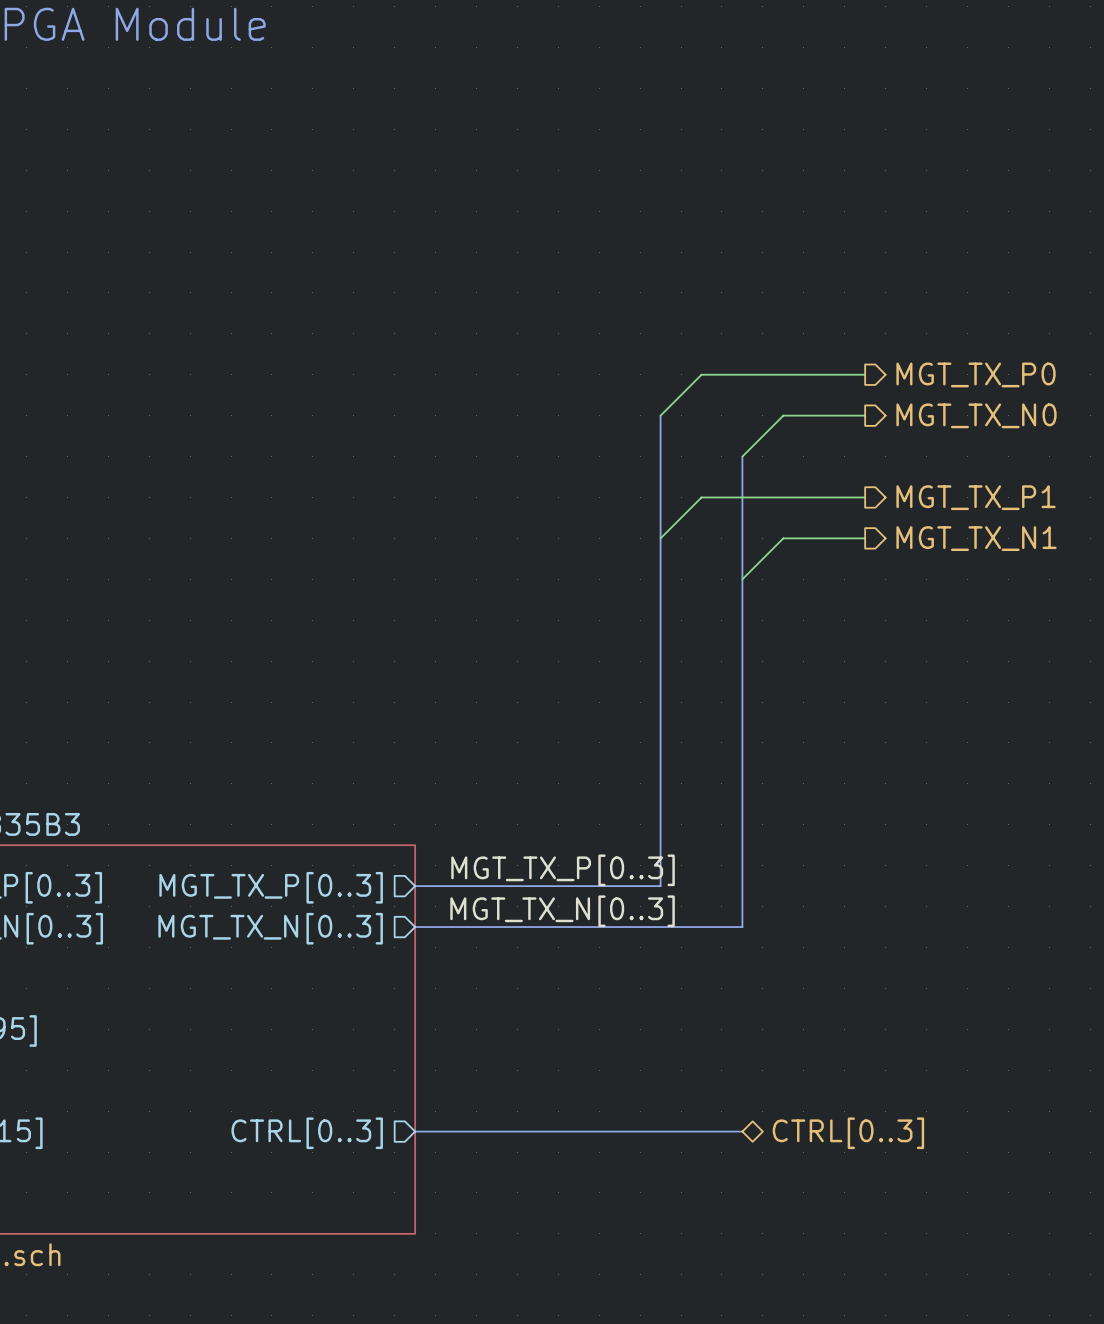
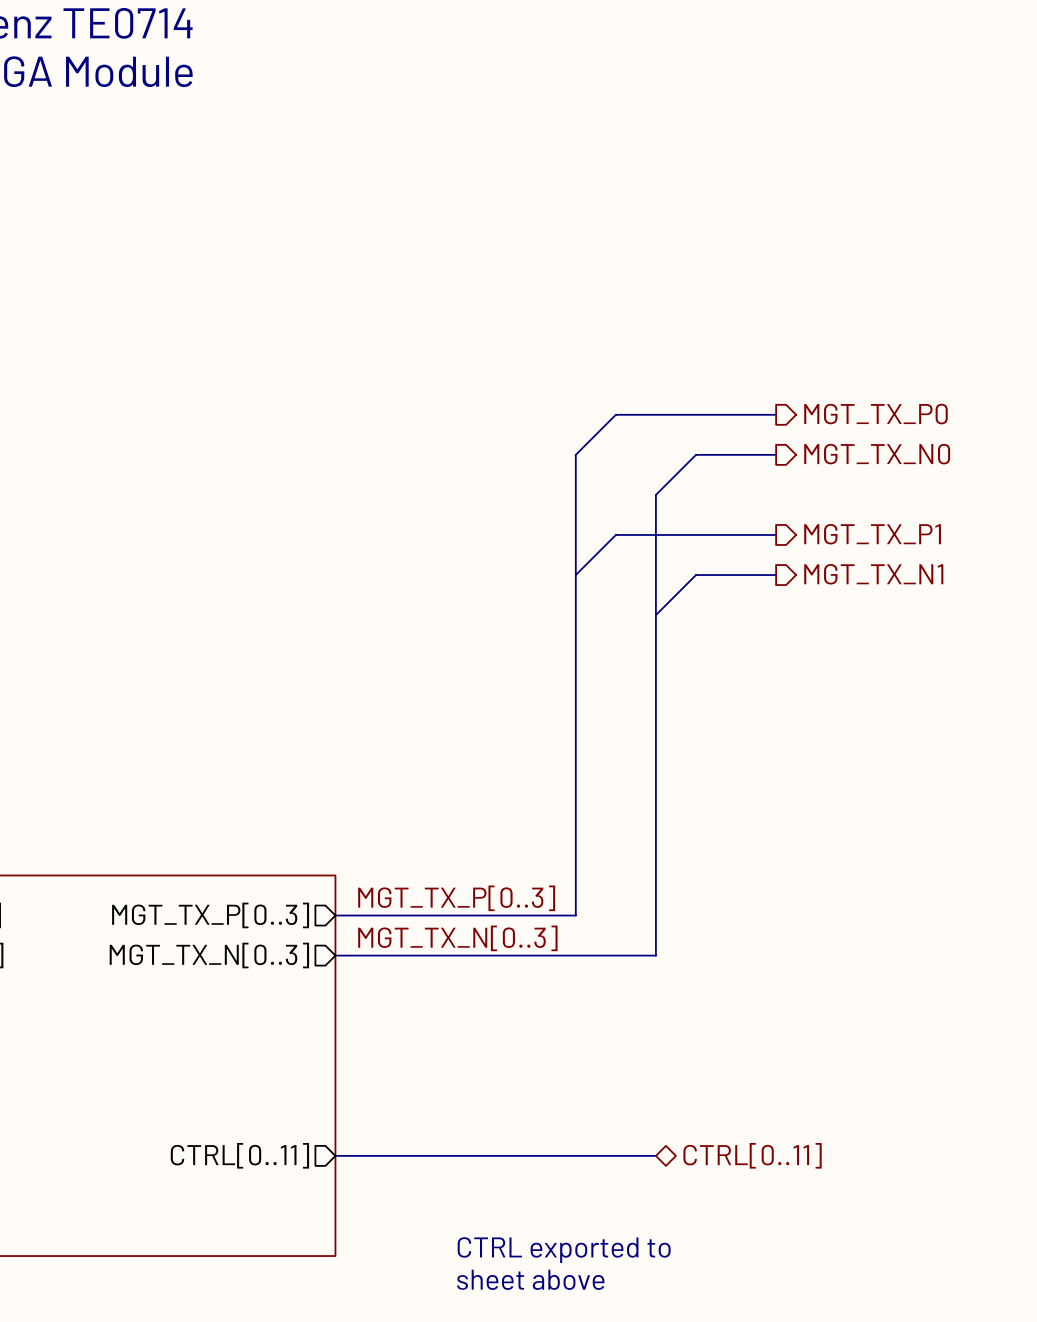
label position: MGT_TX_P[0..3] (563, 870) -> MGT_TX_P[0..3] (456, 898)
label position: MGT_TX_N[0..3] (562, 911) -> MGT_TX_N[0..3] (457, 938)
sheet pin: CTRL[0..3] (307, 1133) -> CTRL[0..11] (239, 1155)
hierarchical label: CTRL[0..3] (848, 1133) -> CTRL[0..11] (752, 1155)
text: none -> CTRL exported to (564, 1250)
text: none -> sheet above (530, 1279)

